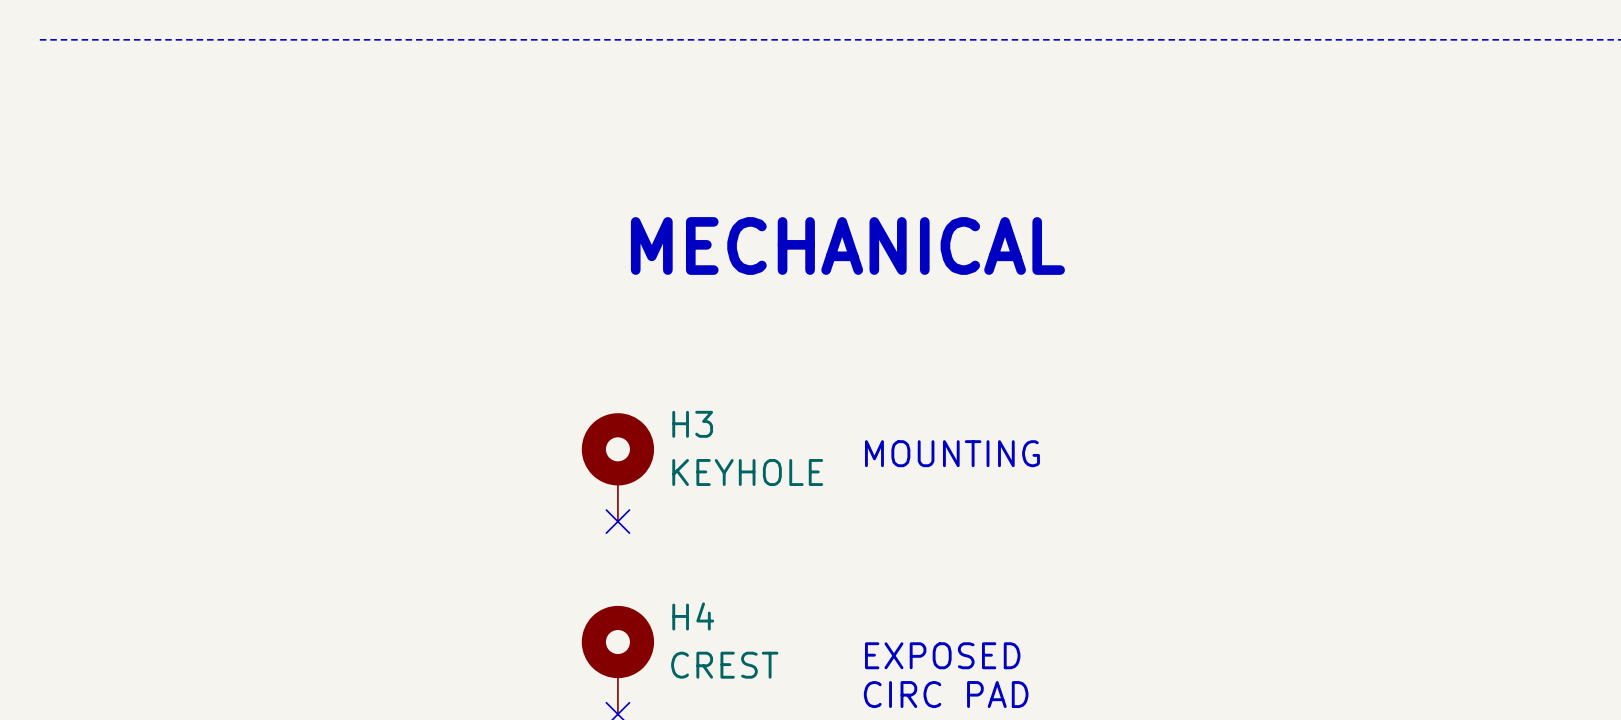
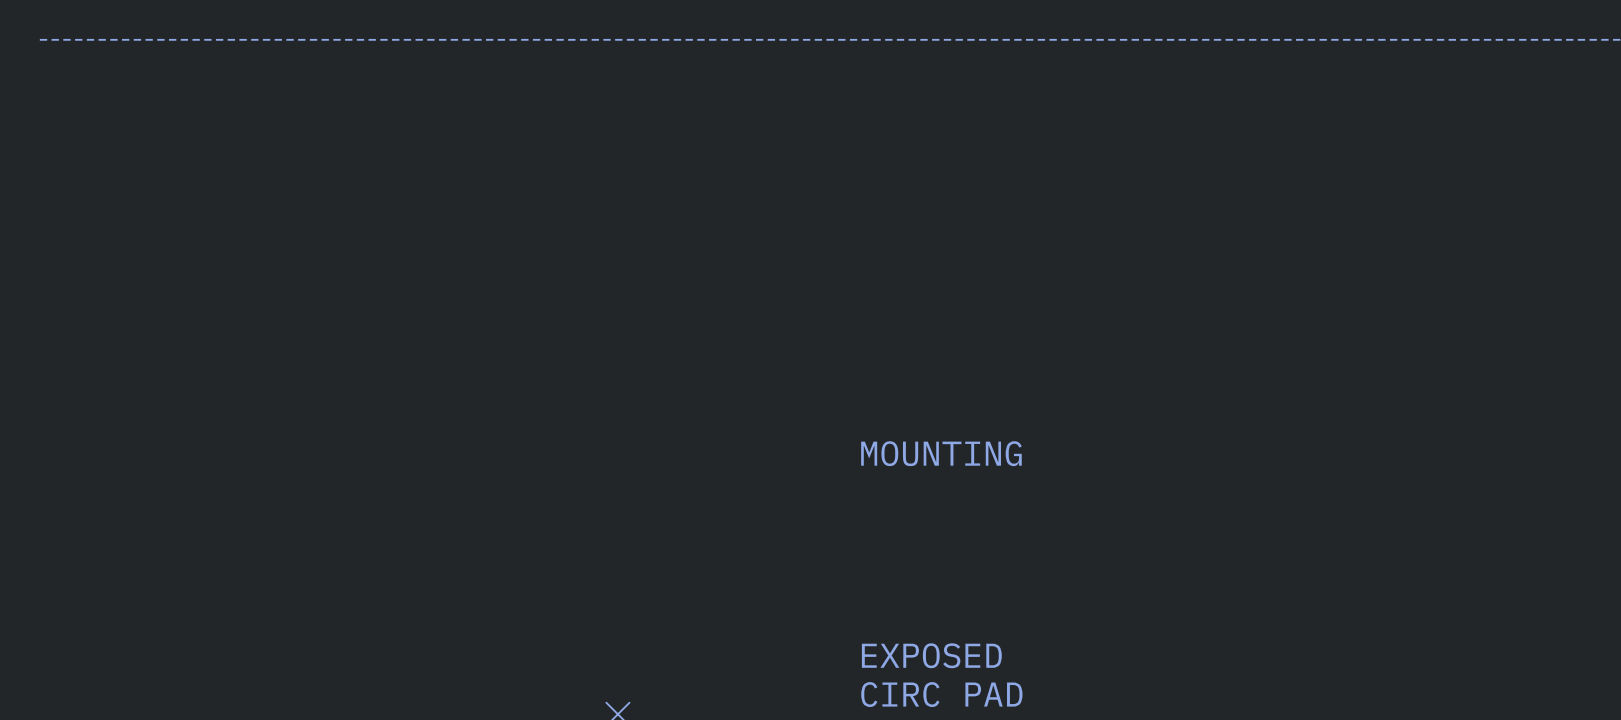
text: MECHANICAL (847, 245) -> none
H3: KEYHOLE (617, 467) -> none
no-connect mark: (617, 521) -> none
H4: CREST (617, 660) -> none

